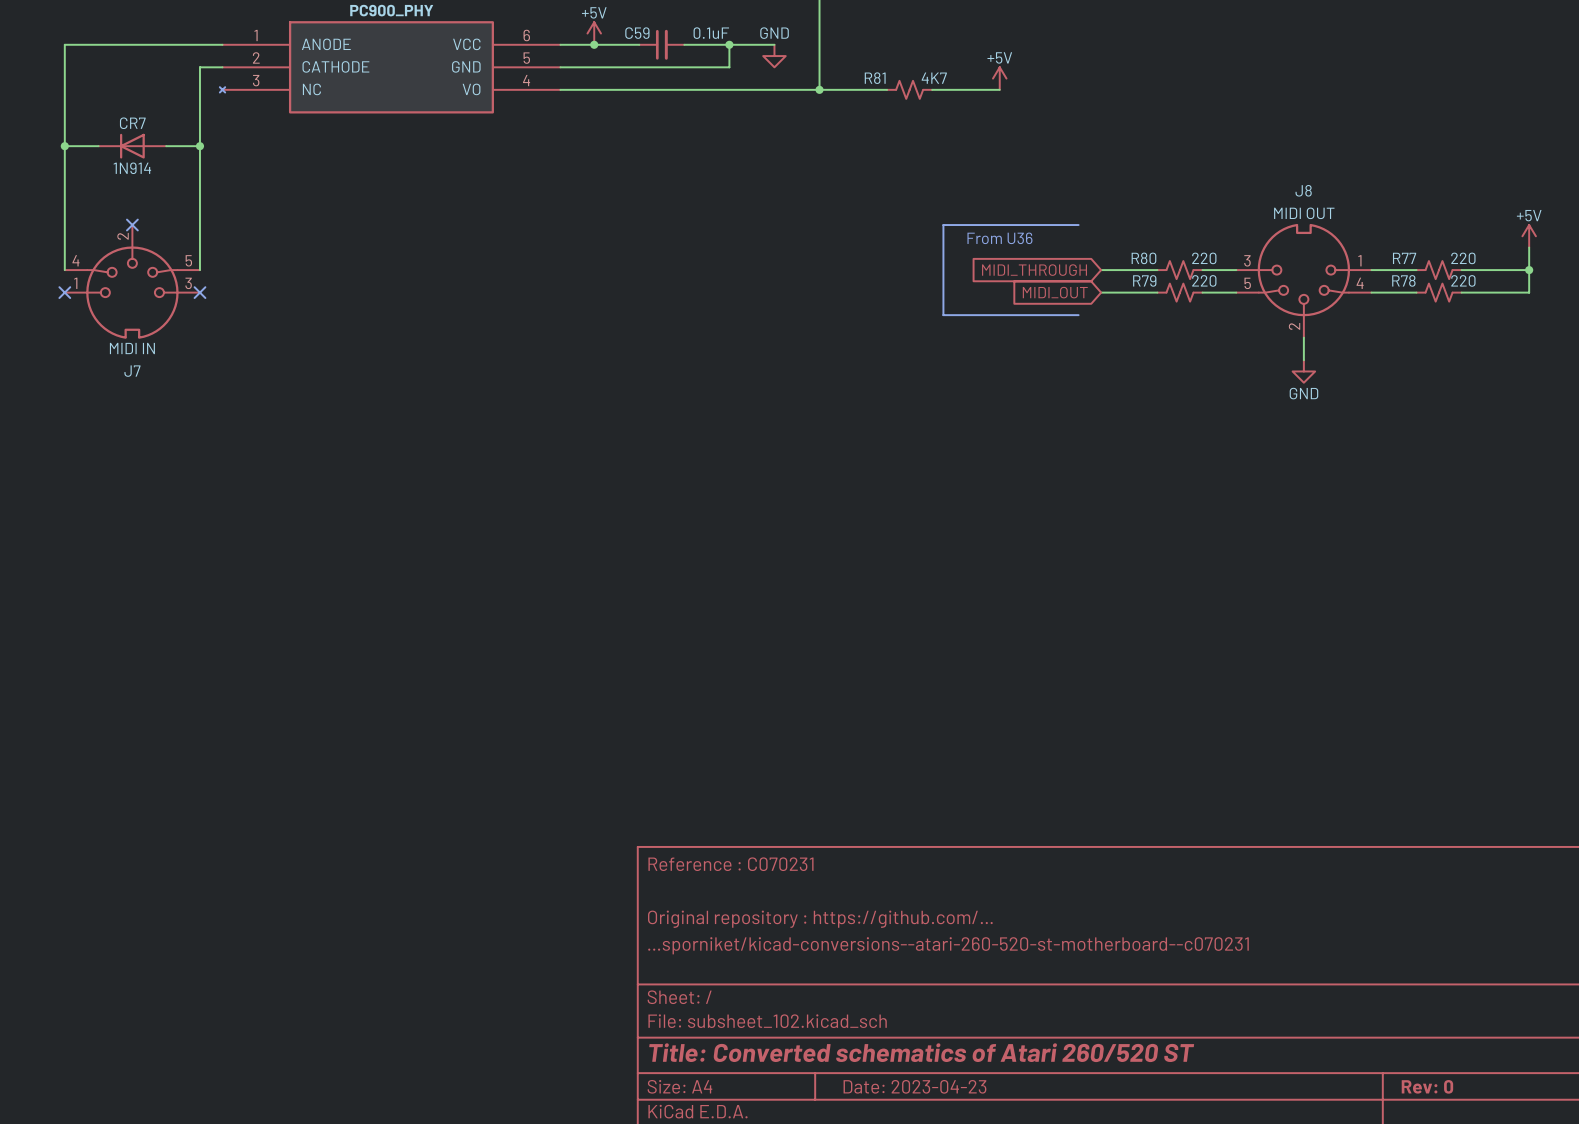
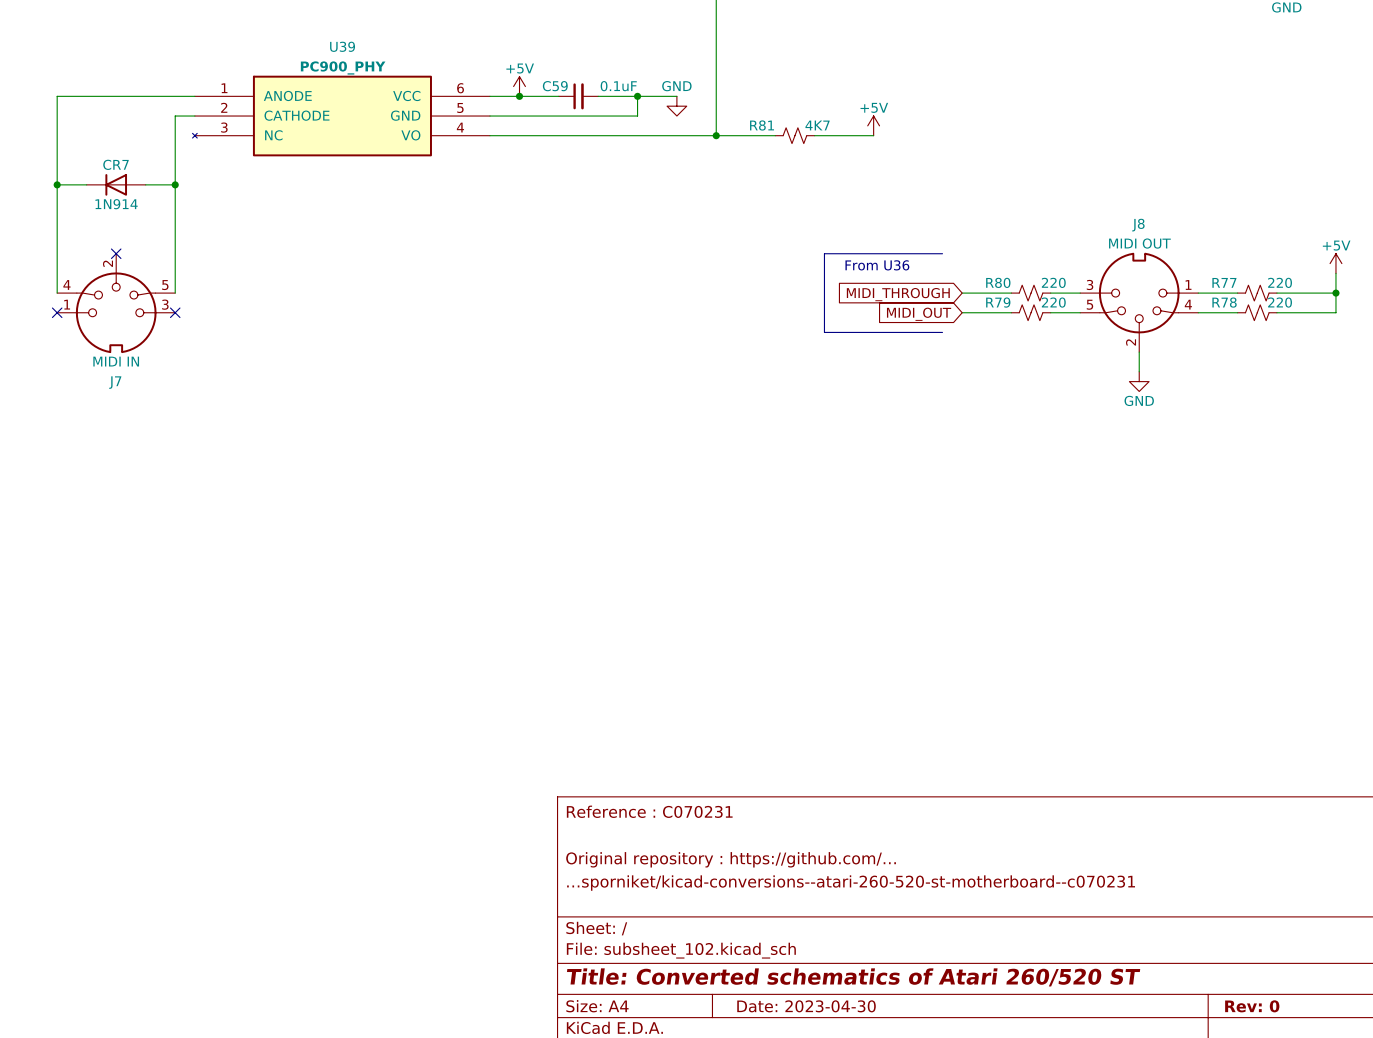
title block: Date: 2023-04-23 (914, 1086) -> Date: 2023-04-30 (806, 1006)

